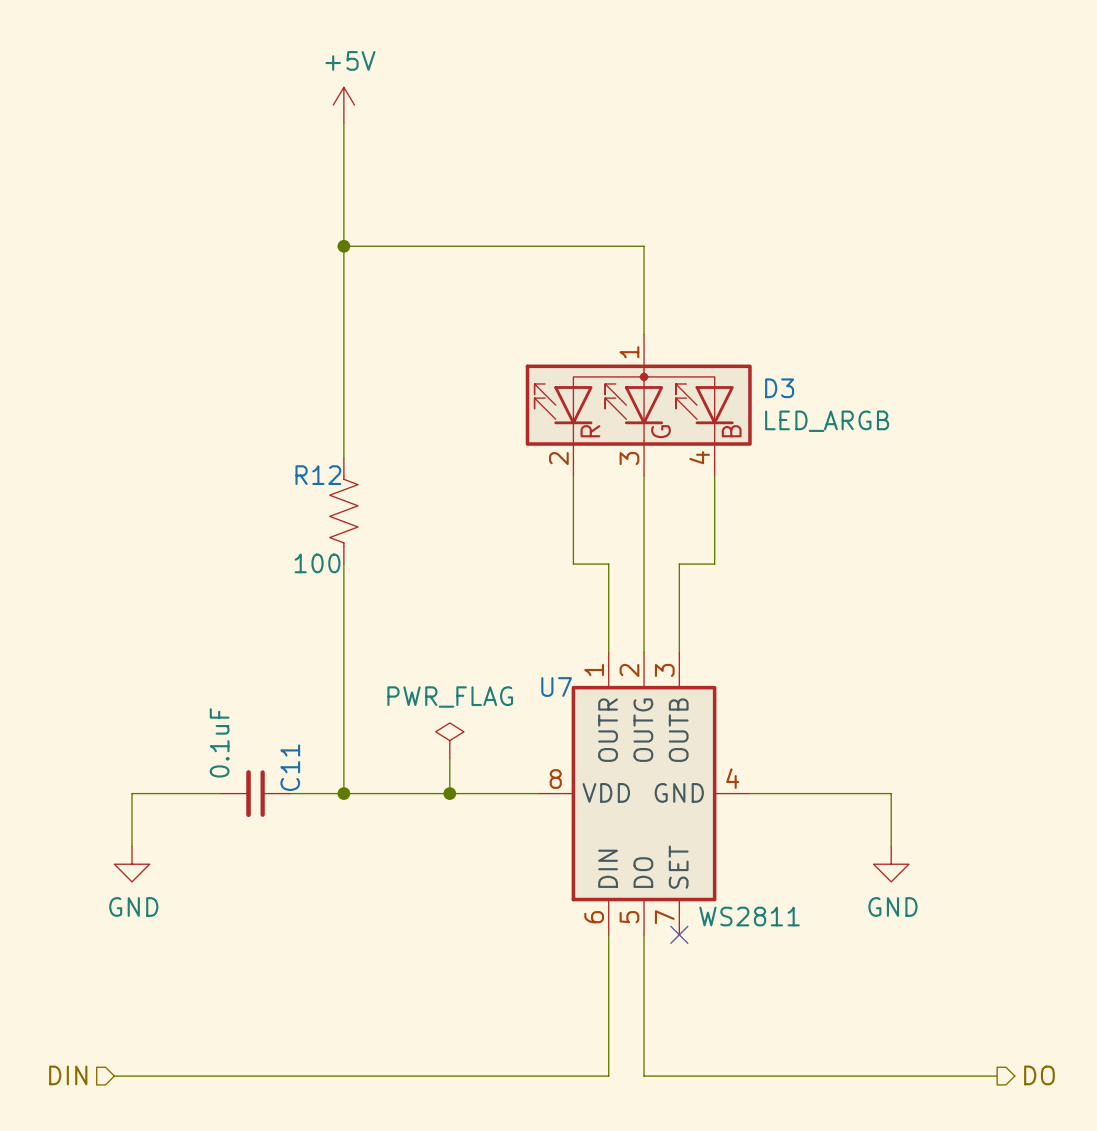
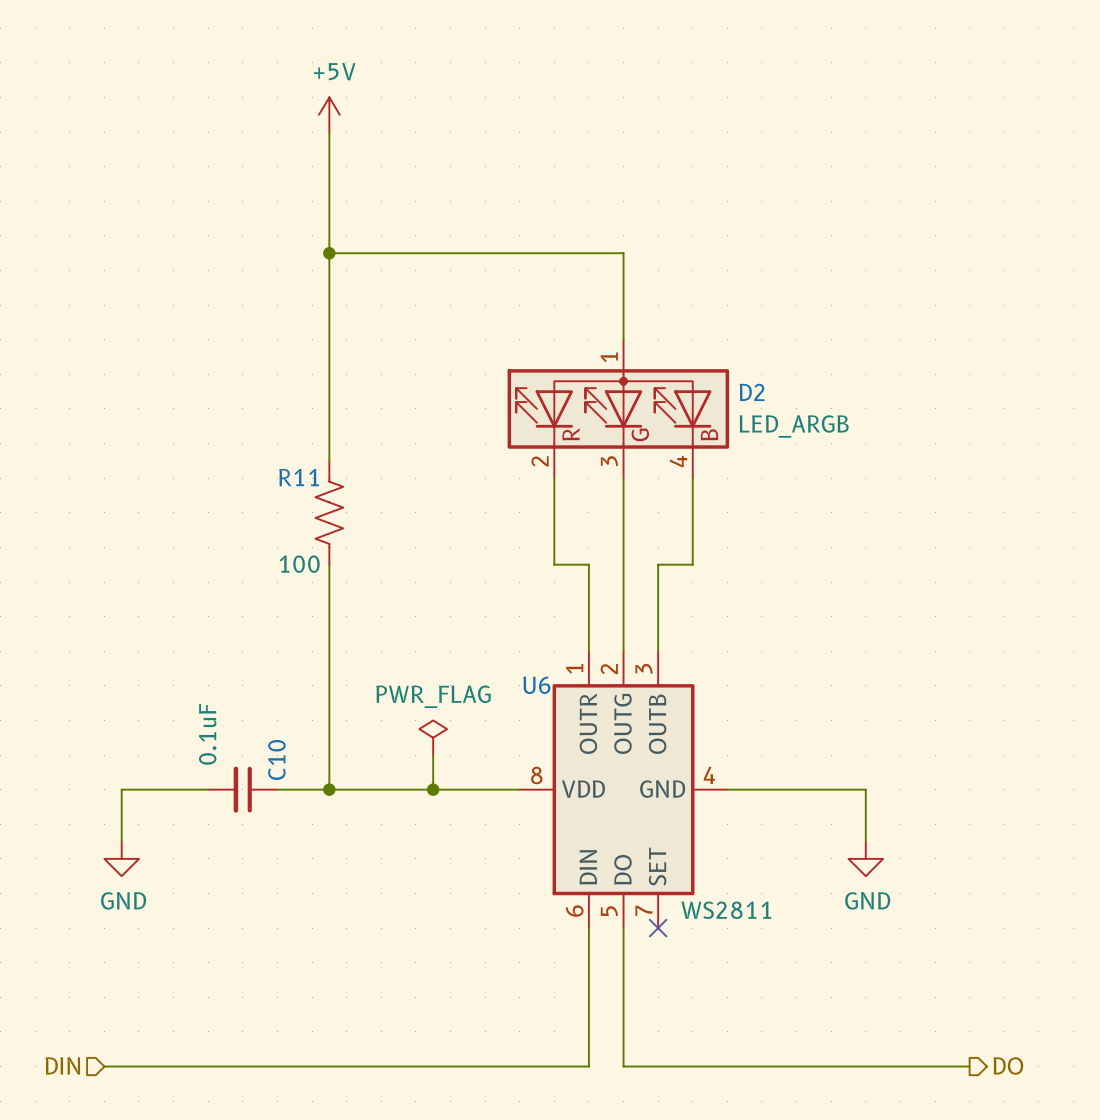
D3 name: D3 (779, 388) -> D2 (752, 392)
R12 name: R12 (318, 475) -> R11 (299, 477)
U7 name: U7 (556, 687) -> U6 (536, 685)
C11 name: C11 (290, 767) -> C10 (276, 759)

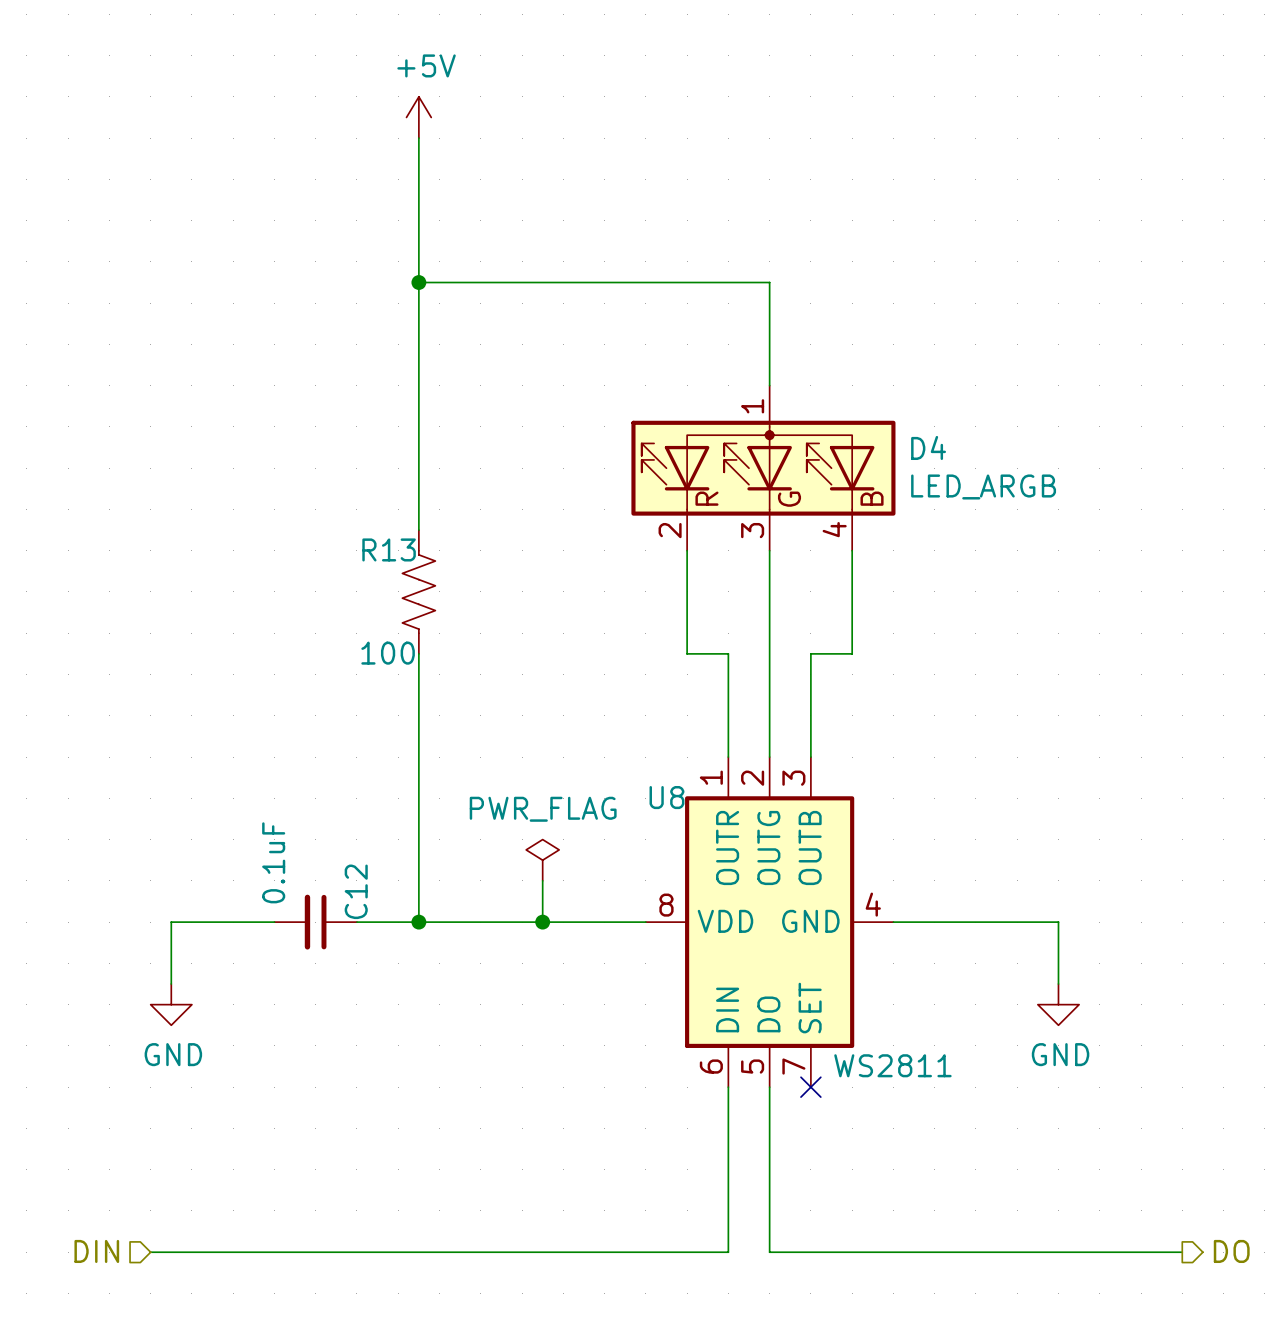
D2 name: D2 (752, 392) -> D4 (928, 447)
R11 name: R11 (299, 477) -> R13 (389, 549)
U6 name: U6 (536, 685) -> U8 (666, 797)
C10 name: C10 (276, 759) -> C12 (356, 891)

